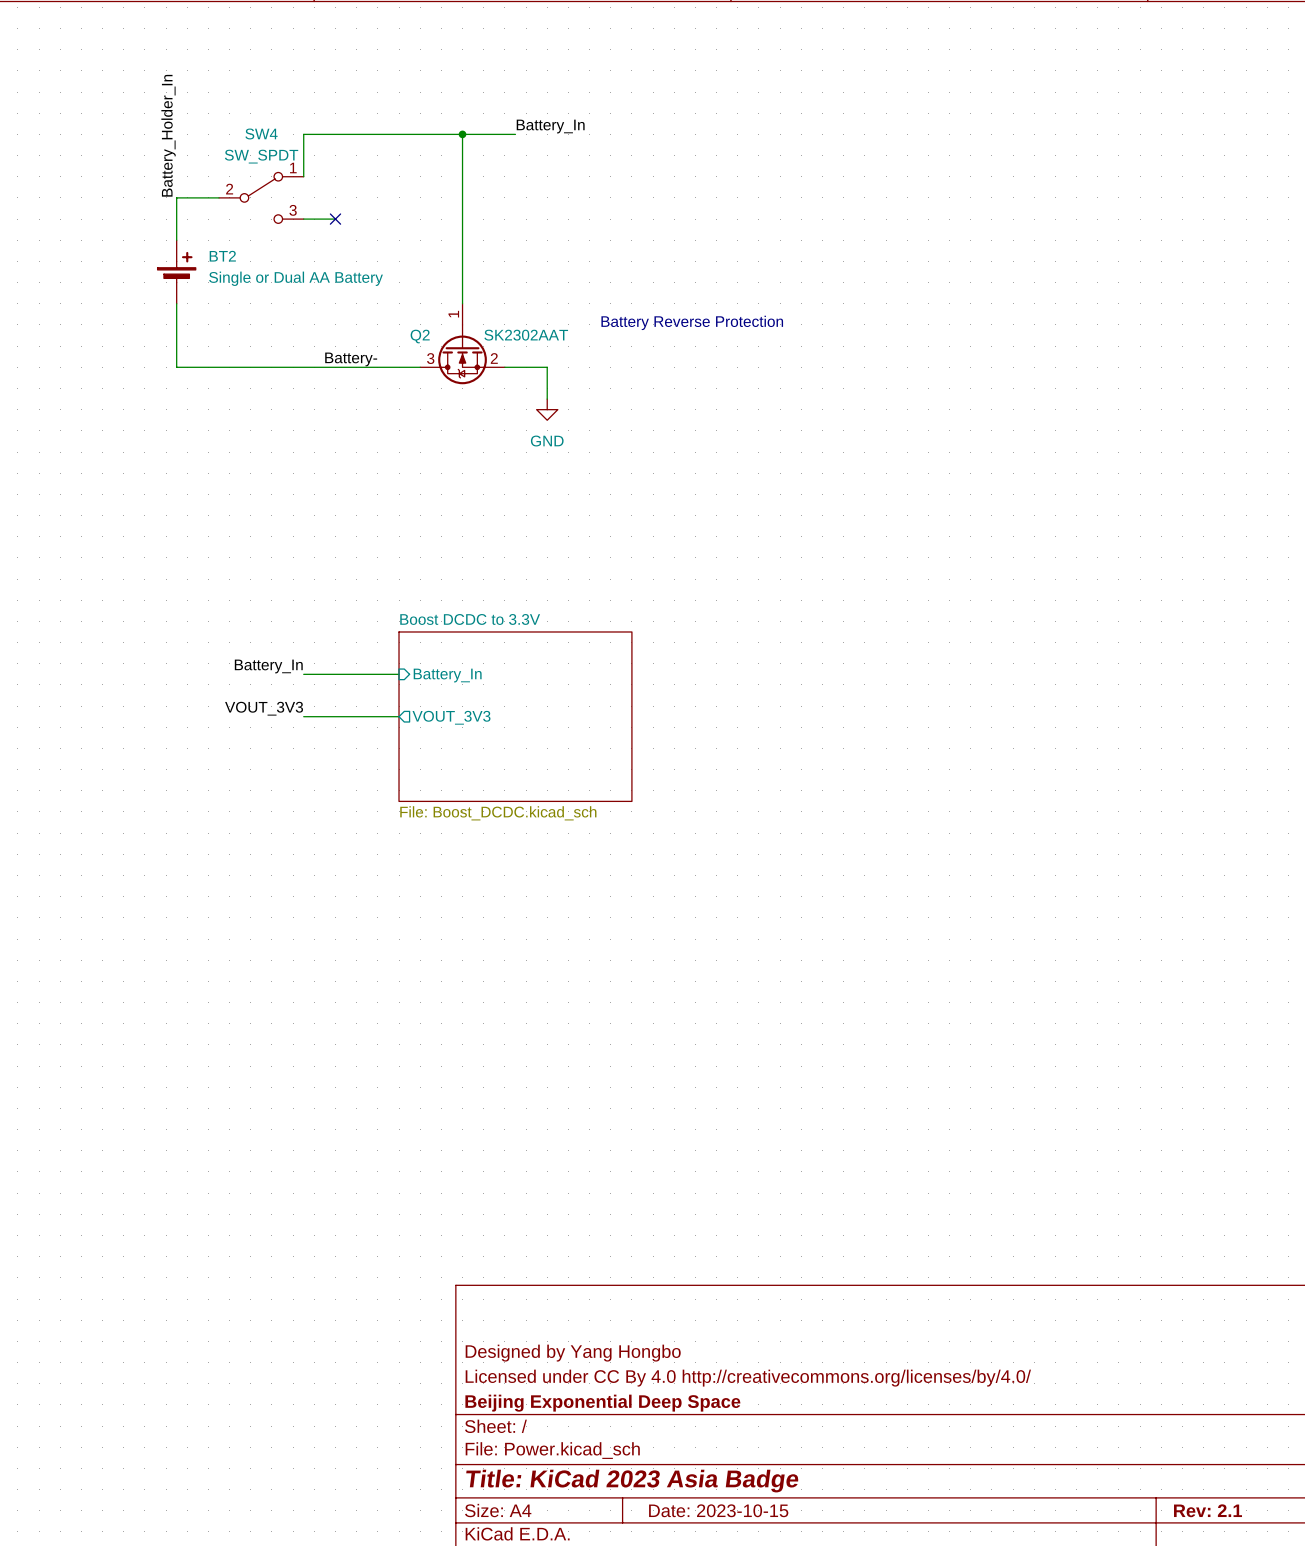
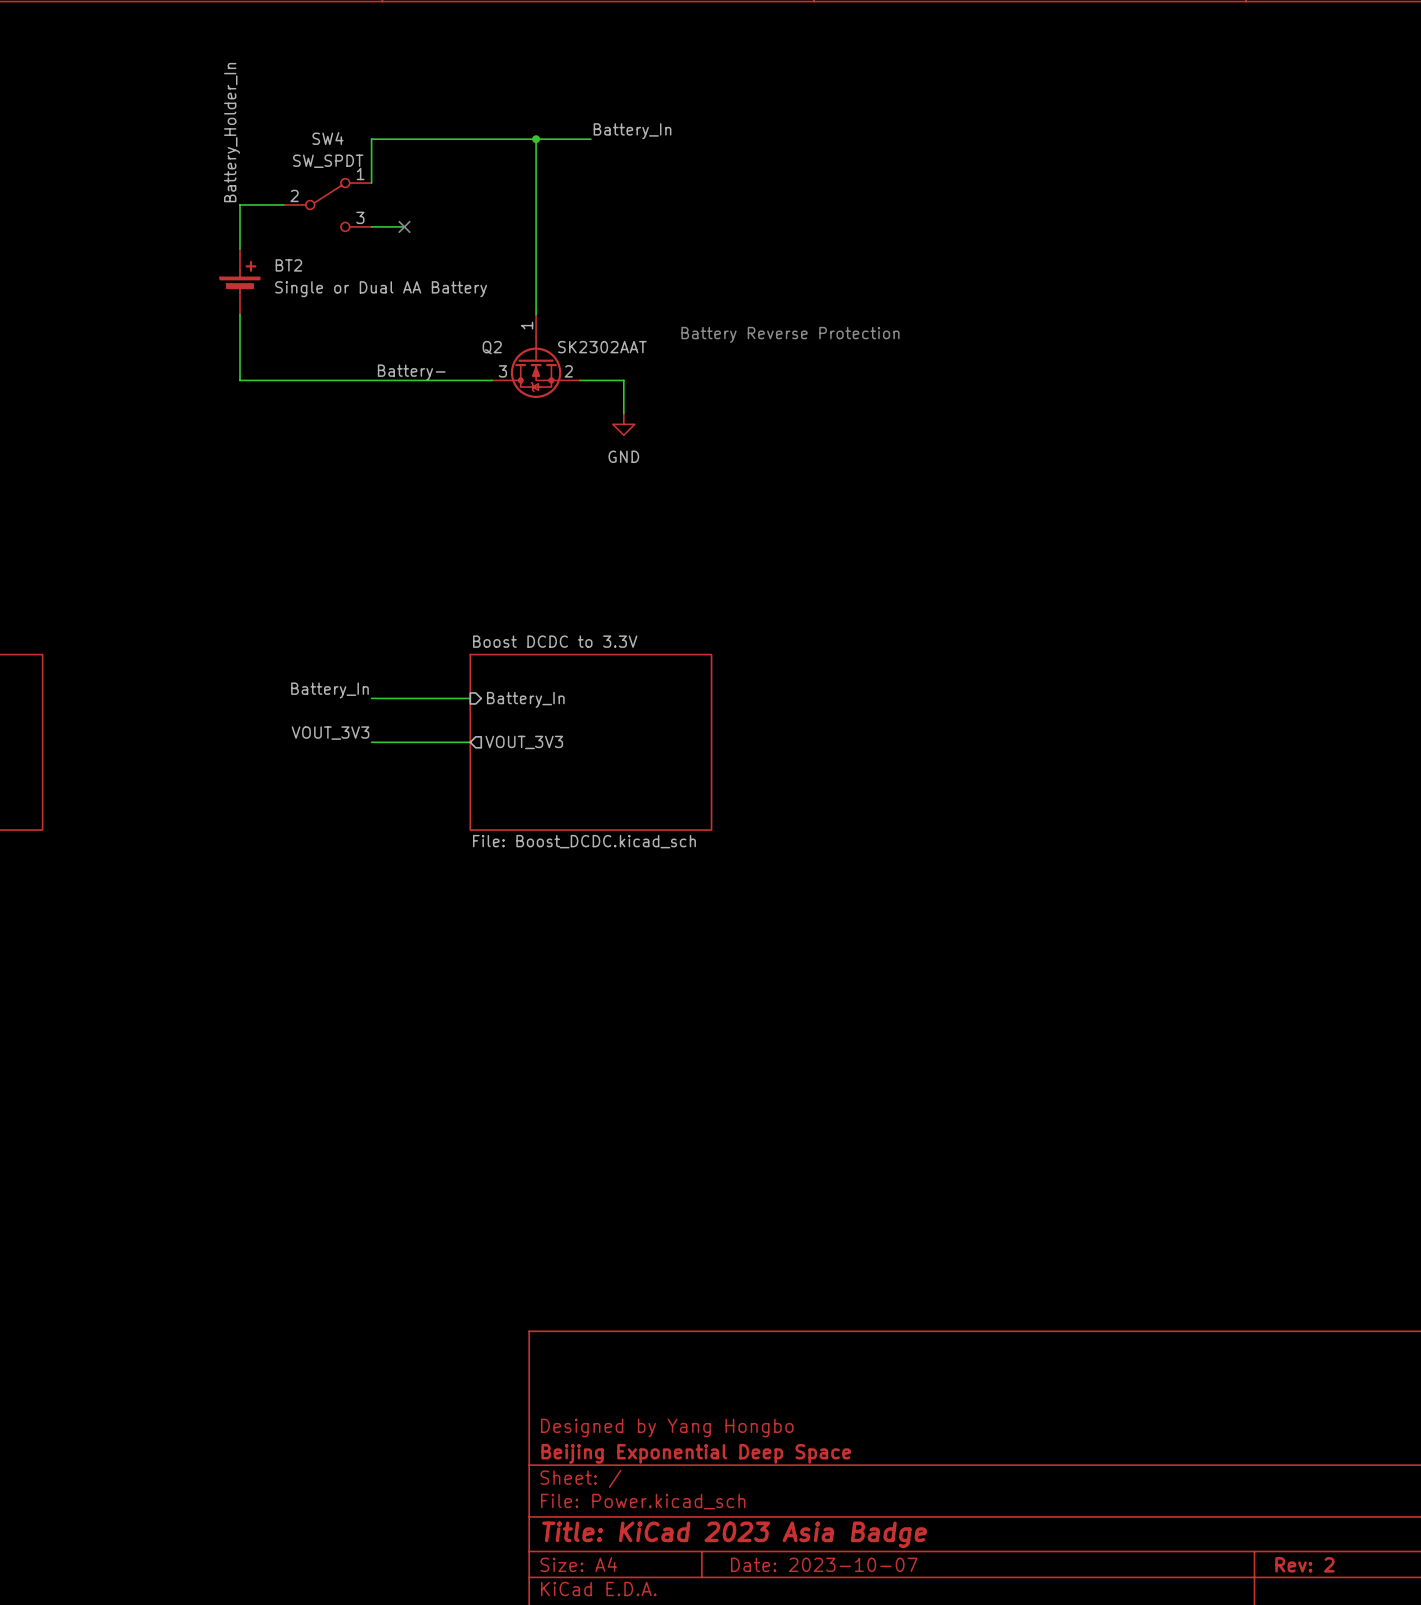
title block: Designed by Yang Hongbo (573, 1353) -> none
title block: Licensed under CC By 4.0 http://creativecommons.org/licenses/by/4.0/ (748, 1378) -> Designed by Yang Hongbo (667, 1427)
title block: Date: 2023-10-15 (718, 1510) -> Date: 2023-10-07 (824, 1564)
title block: Rev: 2.1 (1208, 1510) -> Rev: 2 (1304, 1564)

